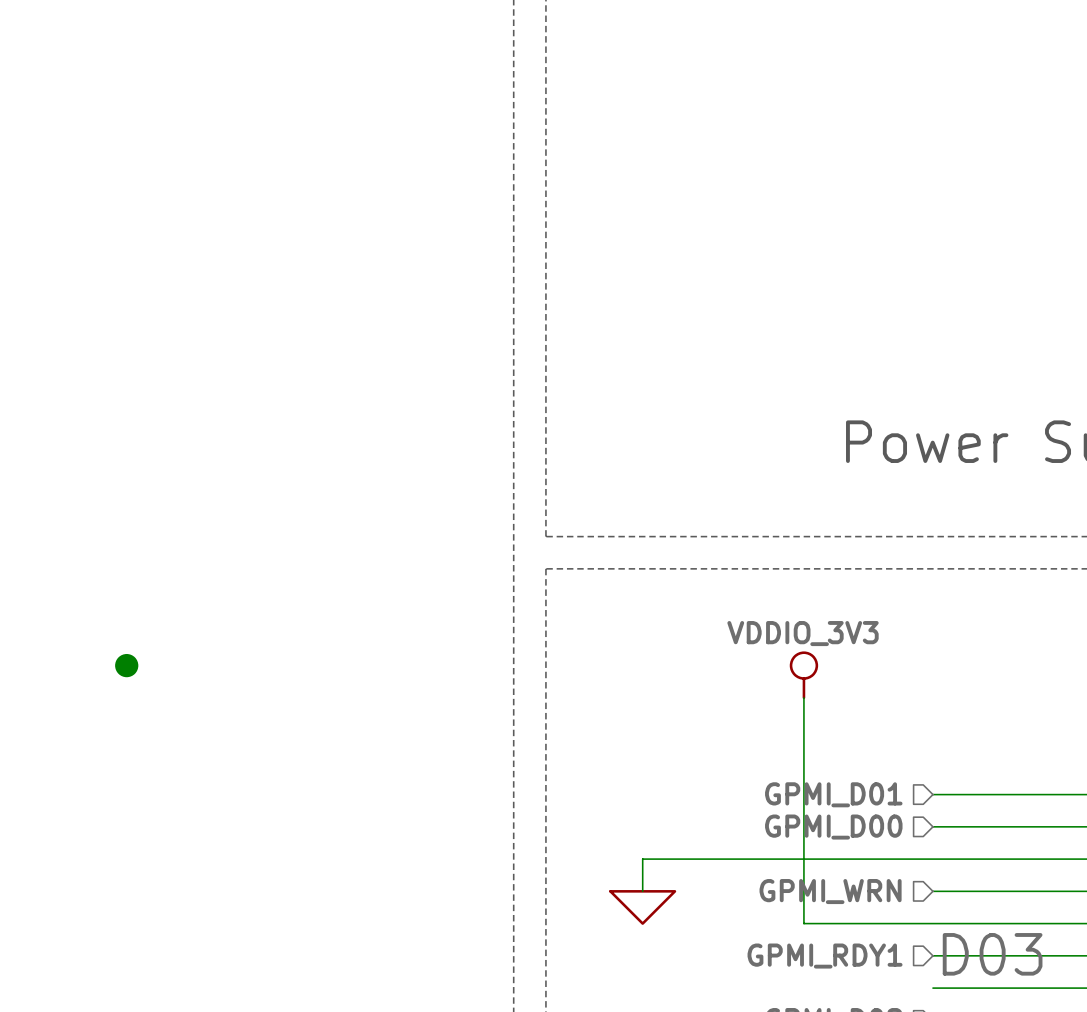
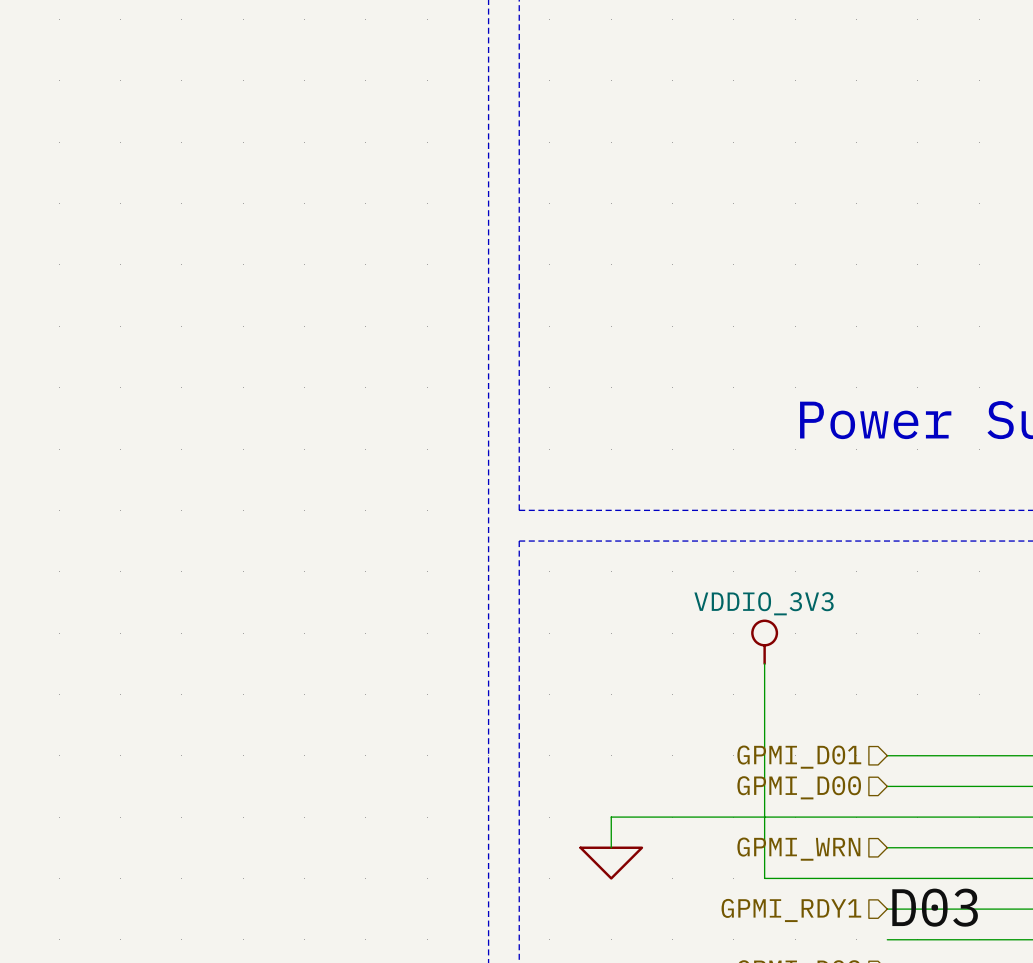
junction: (126, 665) -> none

